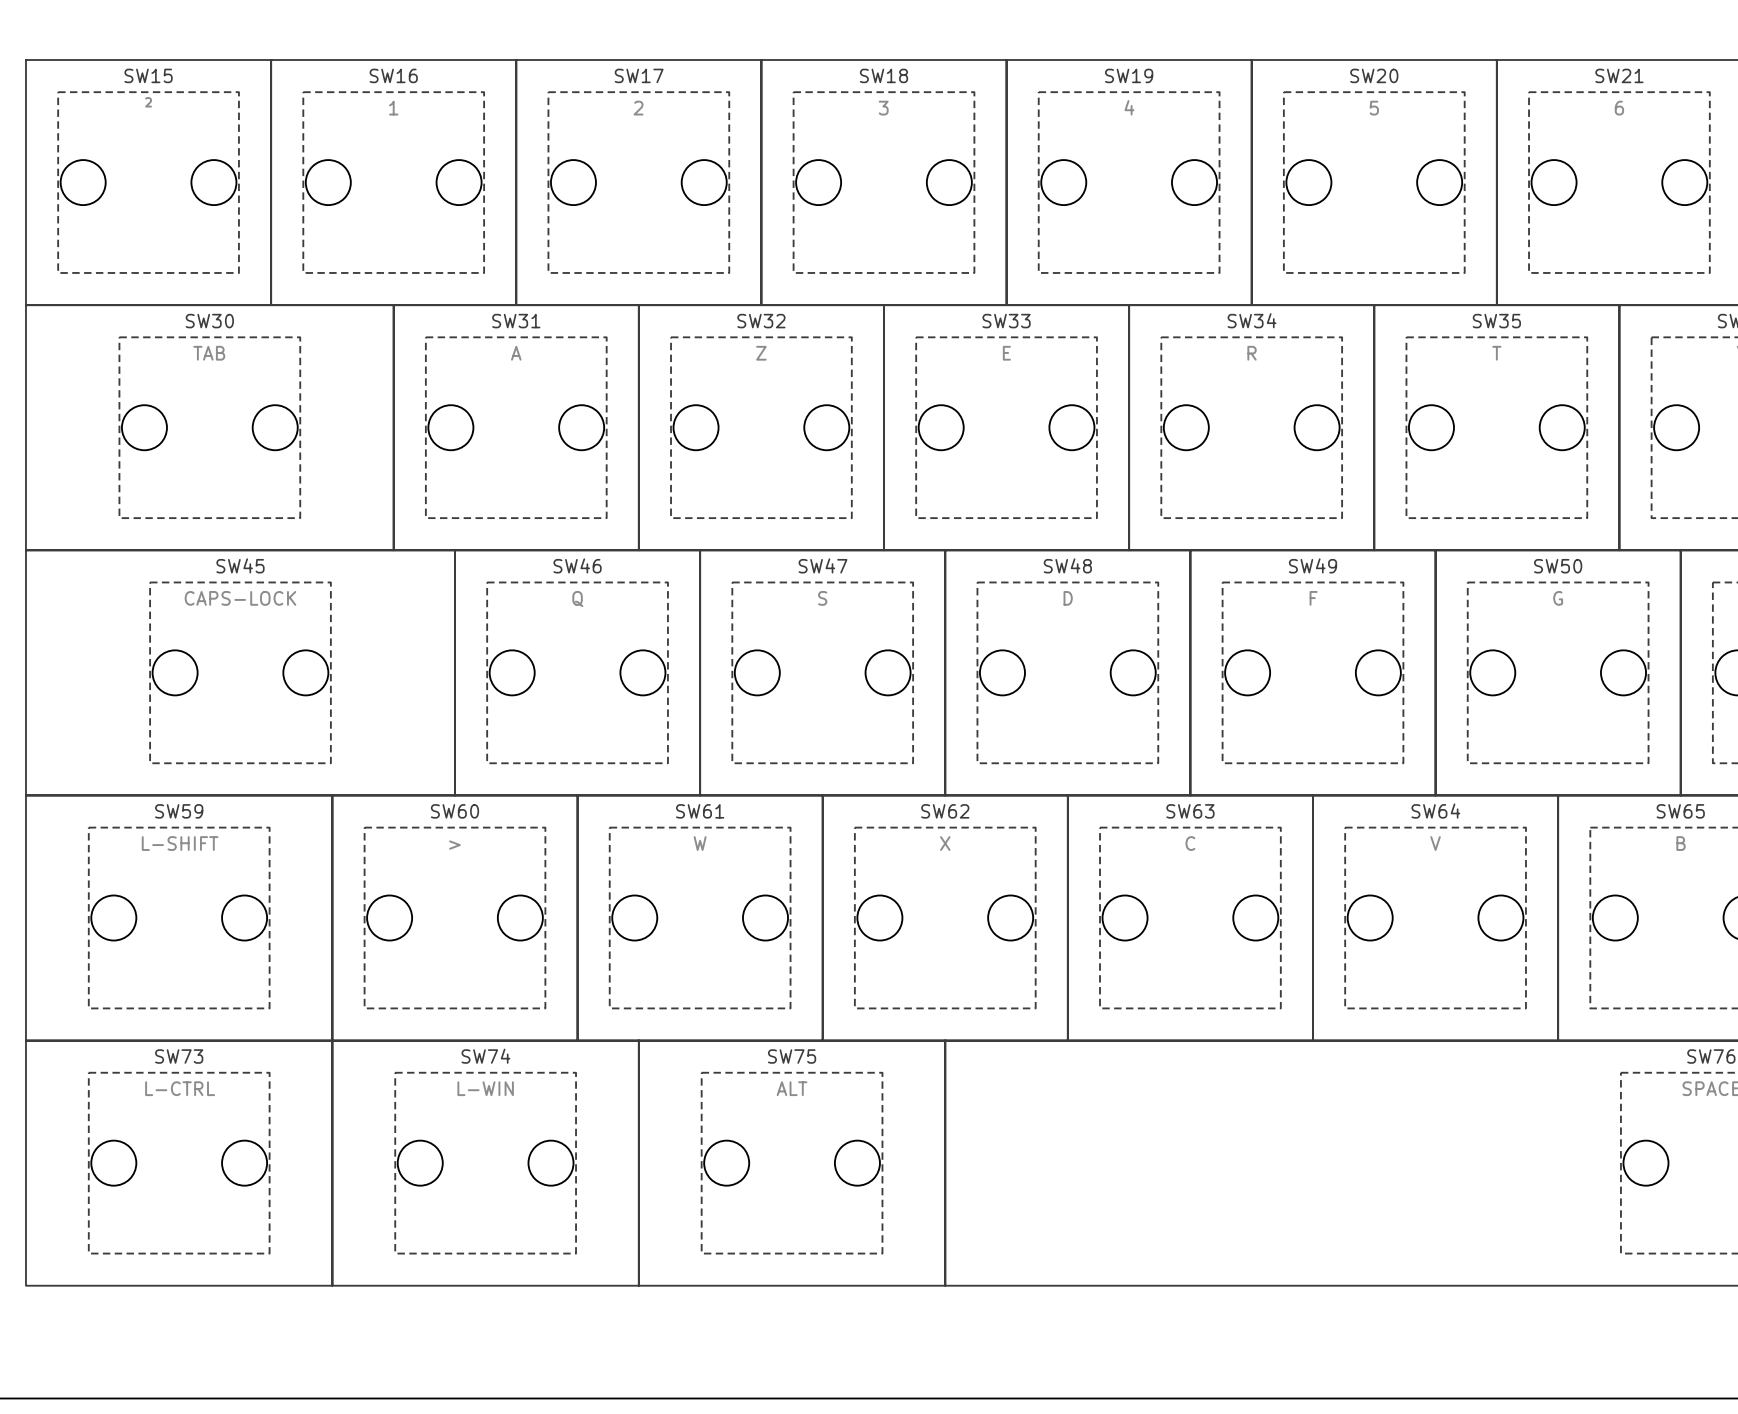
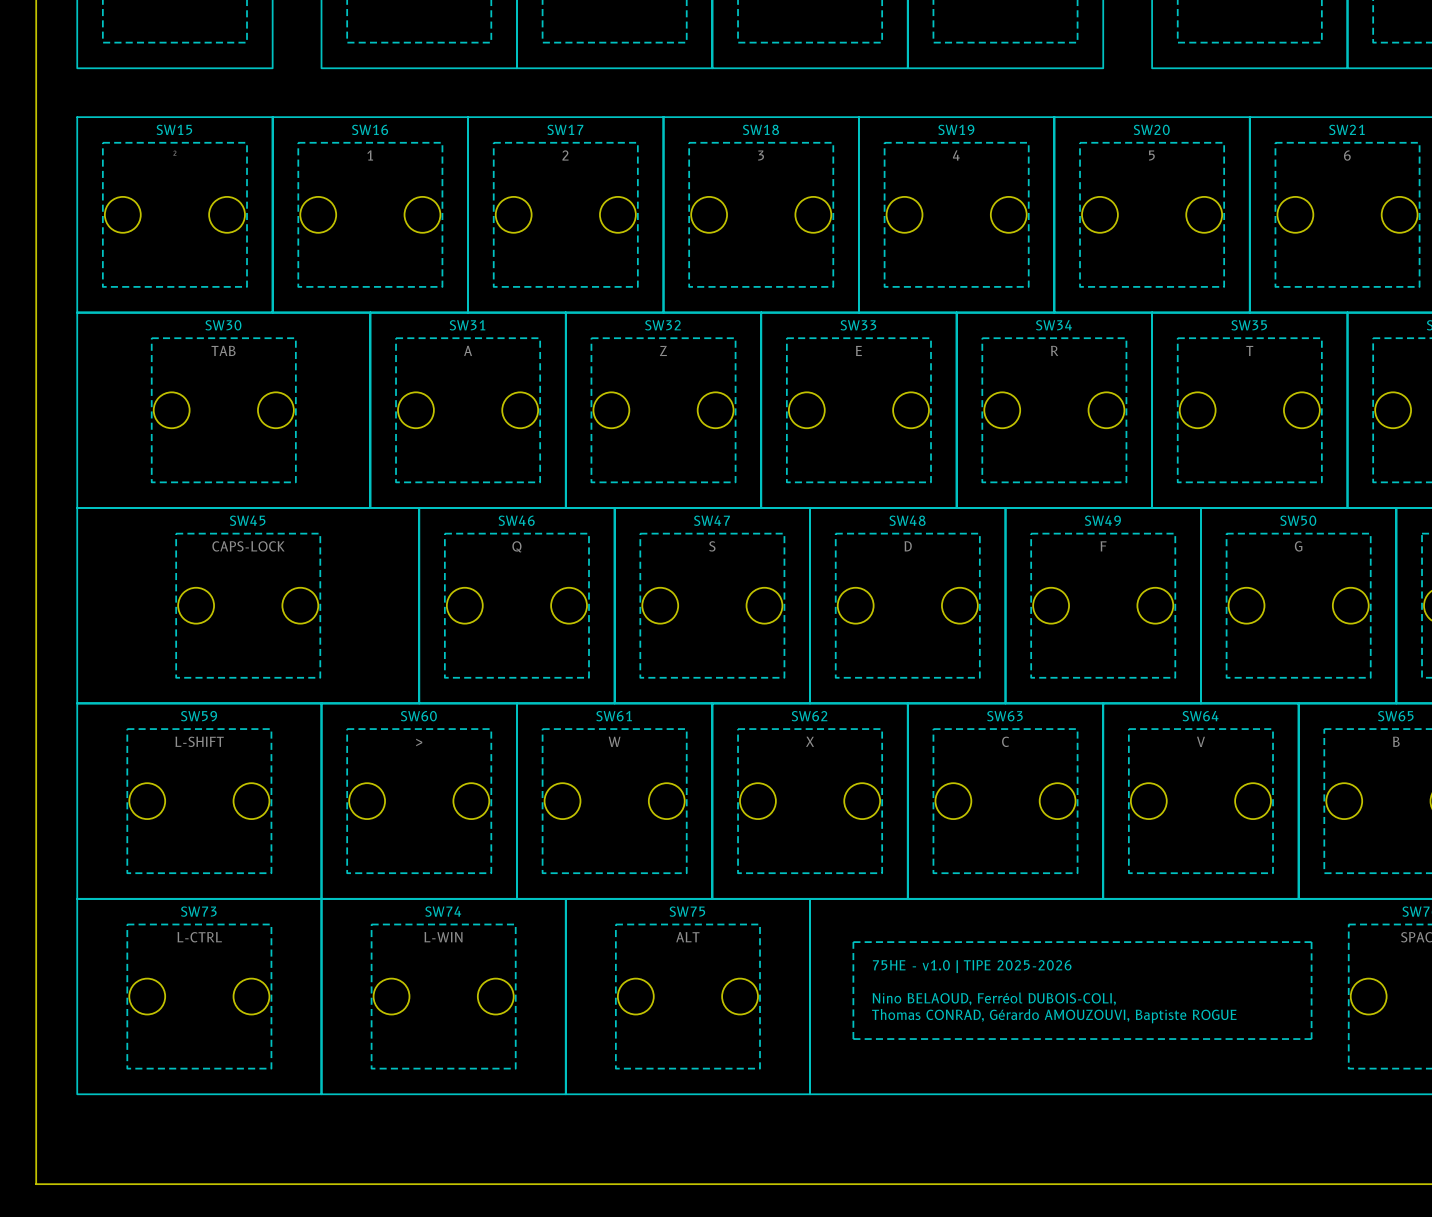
line: none -> (853, 942) (1311, 942) (1311, 1039) (853, 1039) (853, 942)
text: none -> 75HE - v1.0 | TIPE 2025-2026 (972, 966)
text: none -> Nino BELAOUD, Ferréol DUBOIS-COLI, (994, 998)
text: none -> Thomas CONRAD, Gérardo AMOUZOUVI, Baptiste ROGUE (1054, 1016)

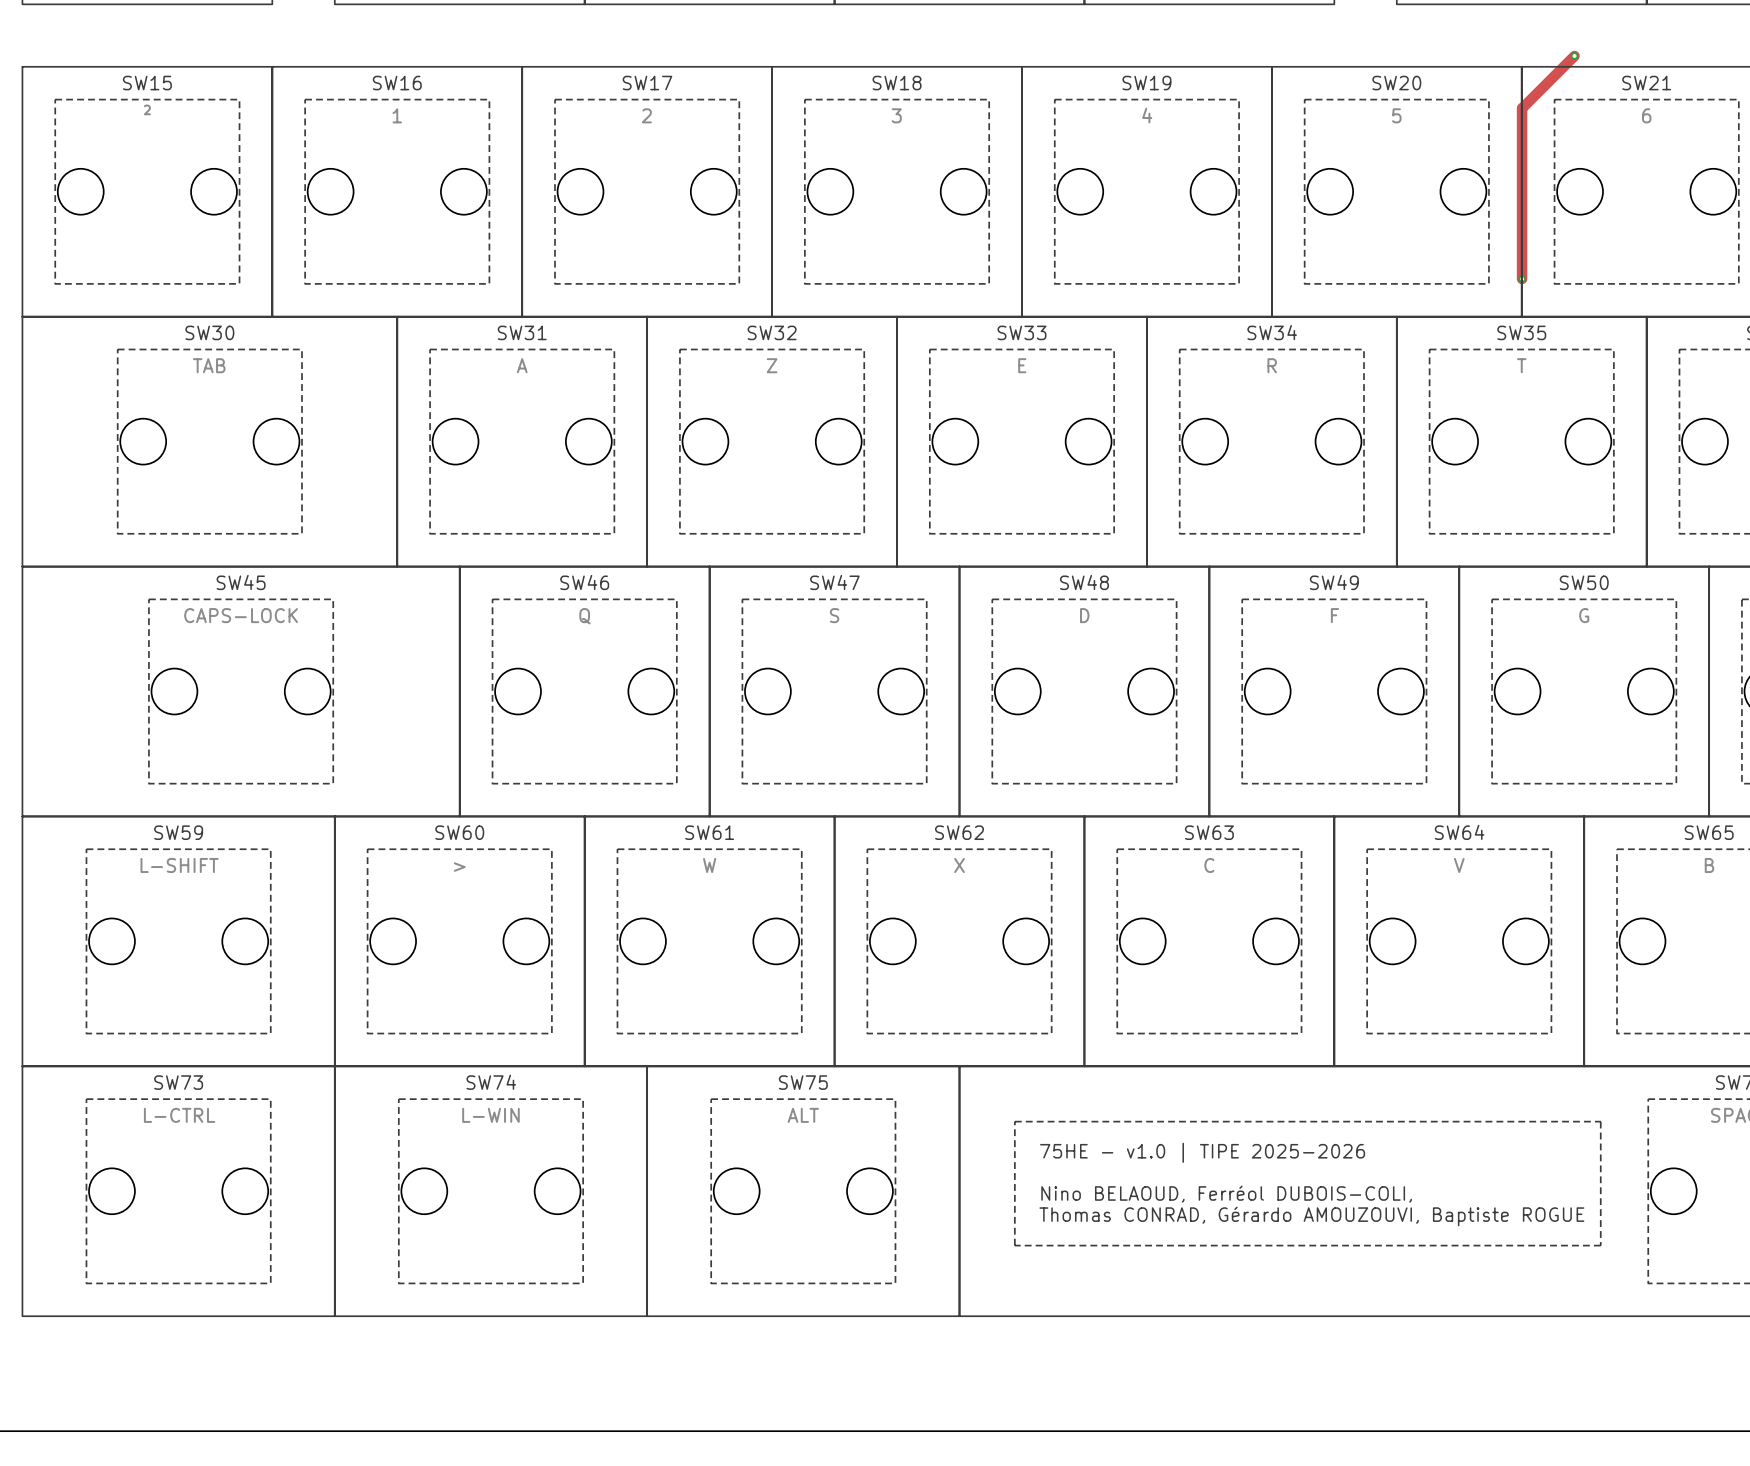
track: none -> (1574, 55) (1522, 108) (1522, 278)
via: none -> (1574, 55)
via: none -> (1522, 278)

